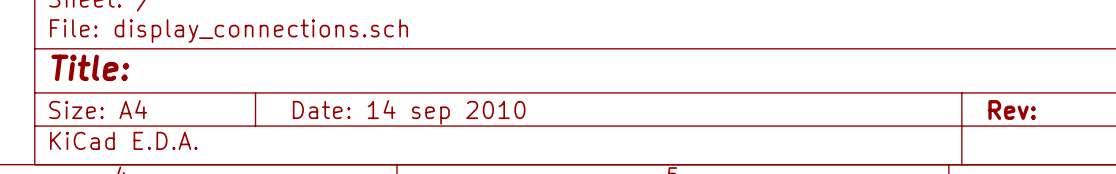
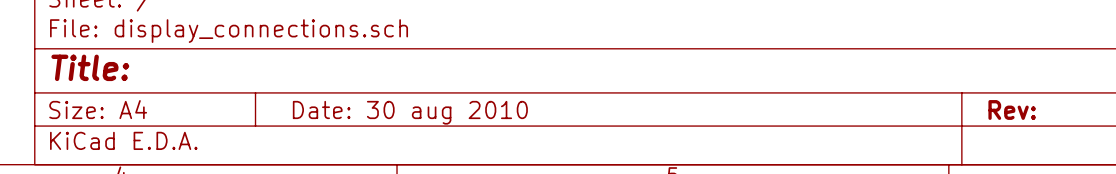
title block: Date: 14 sep 2010 (409, 112) -> Date: 30 aug 2010 (410, 112)

